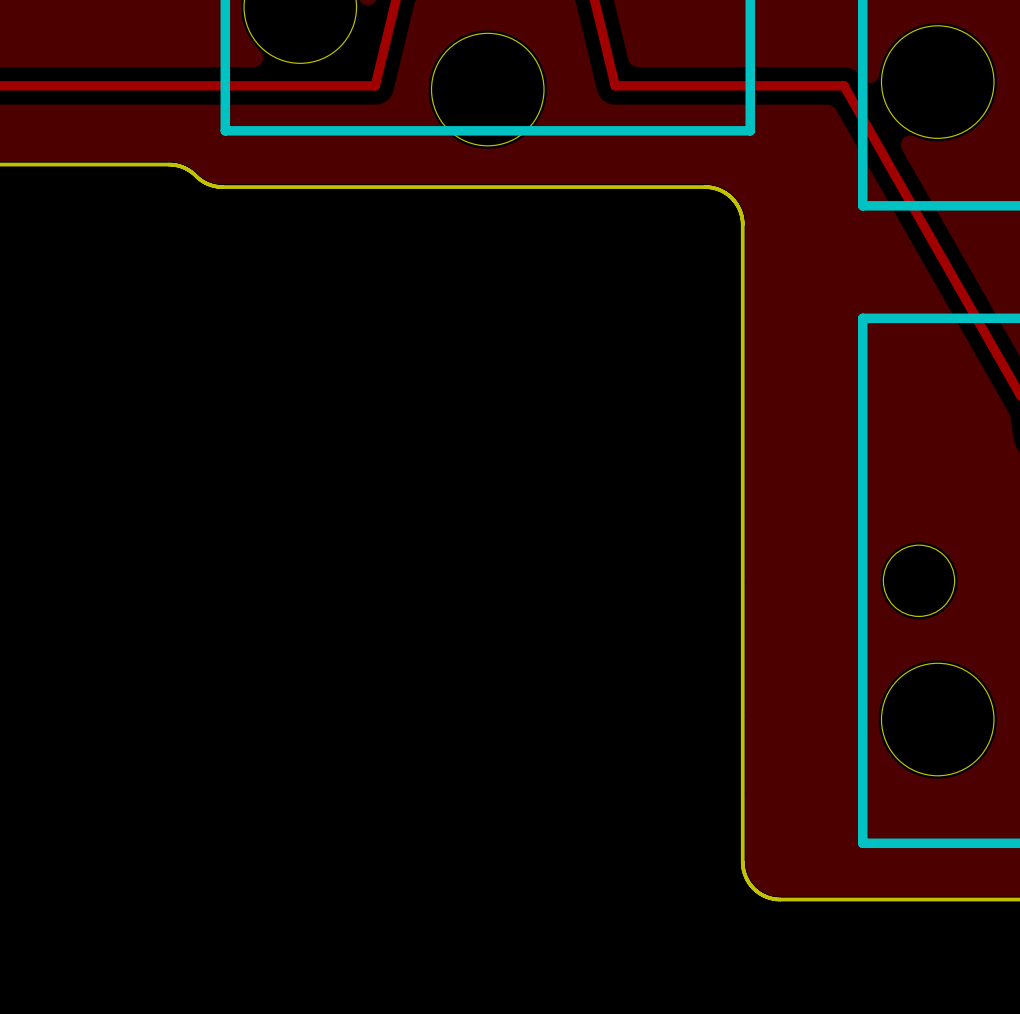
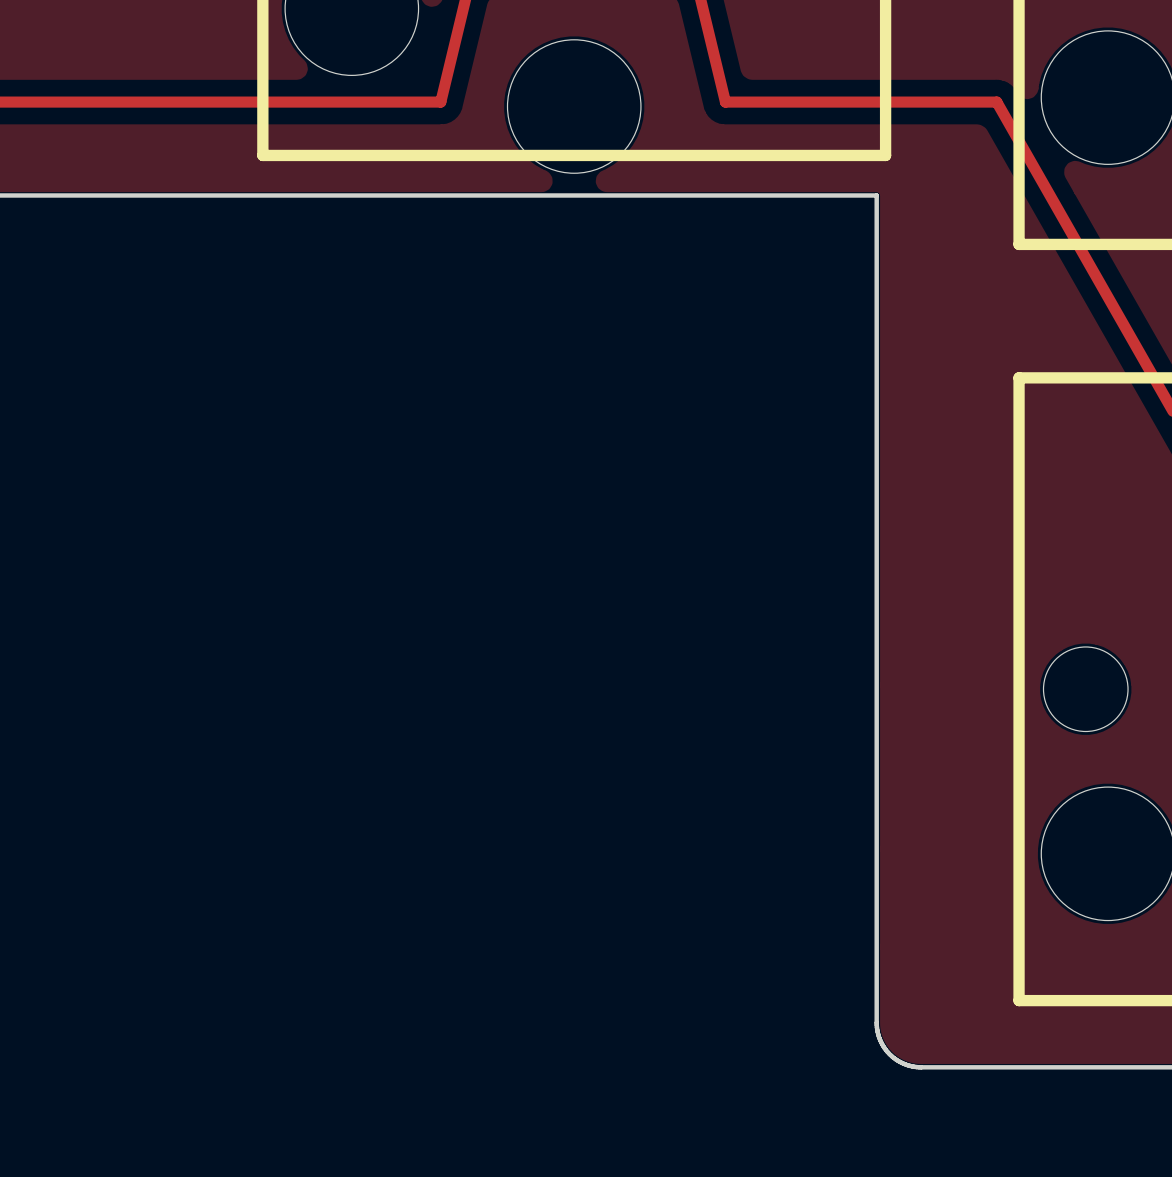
board edge: (169, 164) (184, 167) (205, 182) (220, 187) (709, 187) (721, 190) (733, 200) (740, 211) (742, 224) -> (196, 195) (876, 195) (876, 266)

